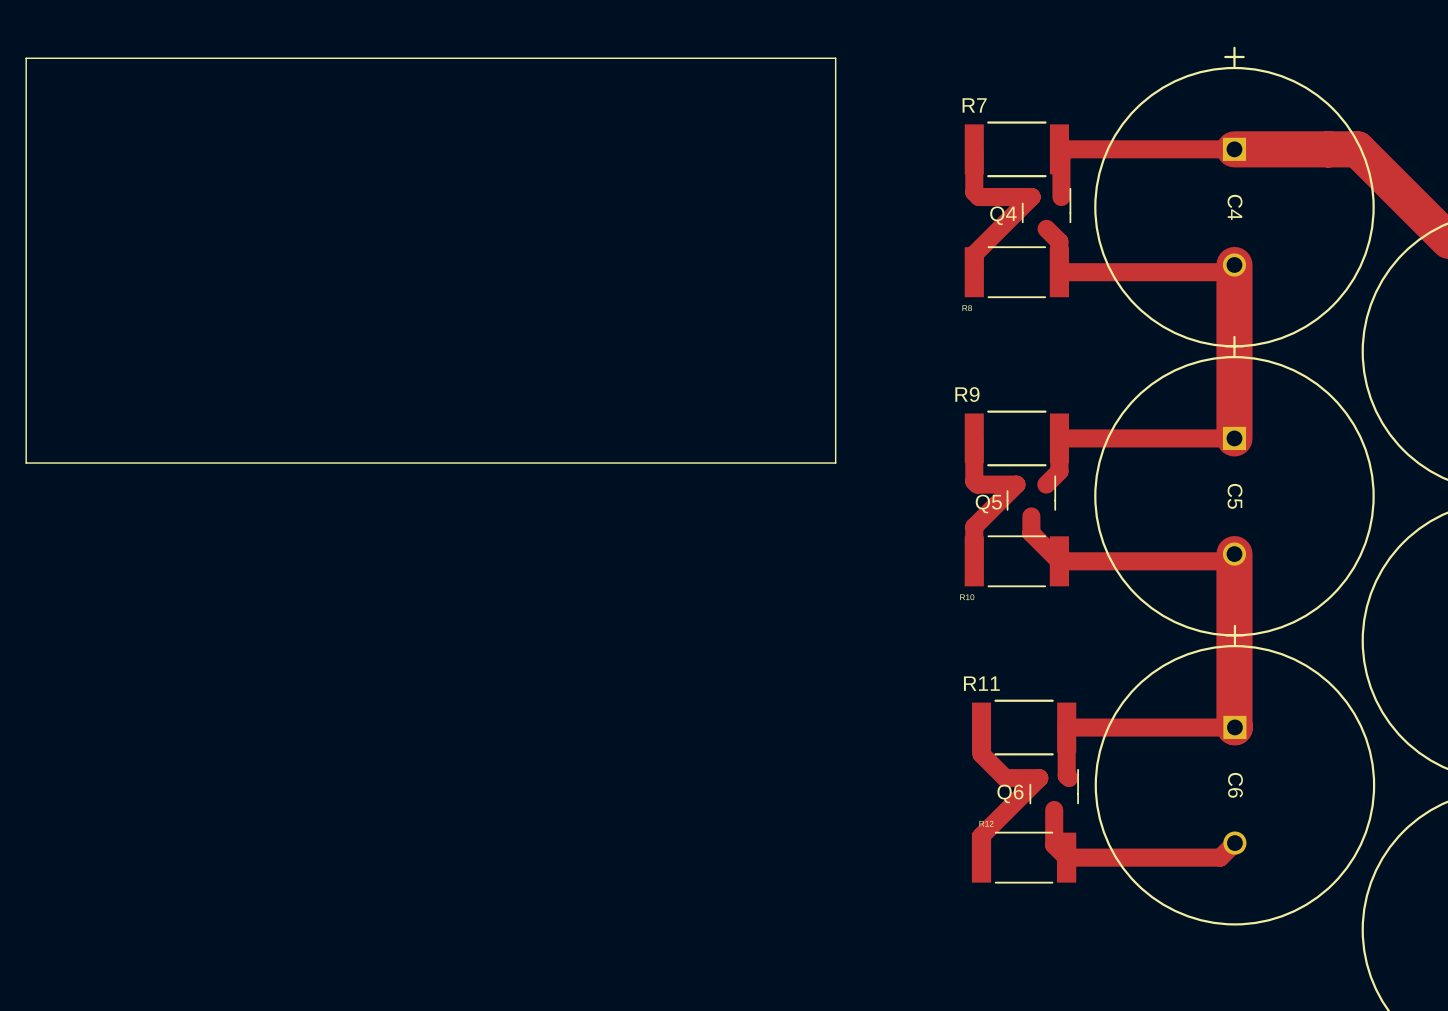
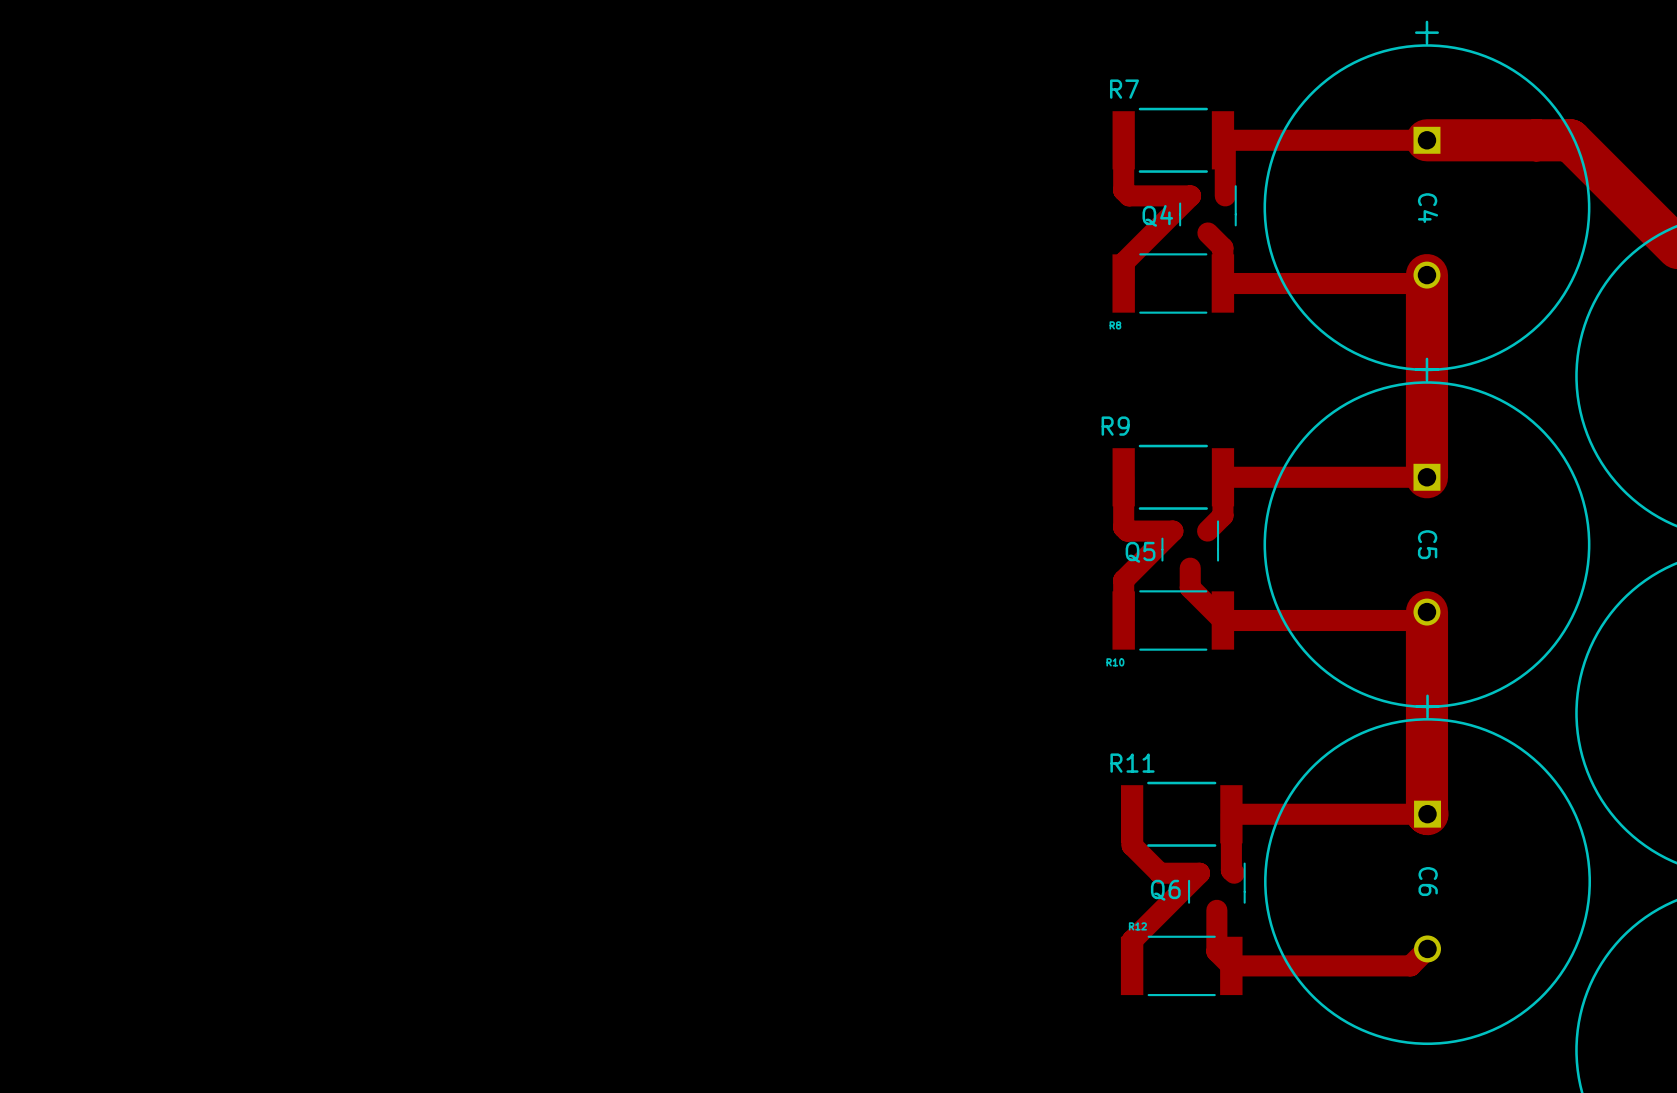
line: (26, 58) (835, 58) (835, 463) (26, 463) (26, 58) -> none

